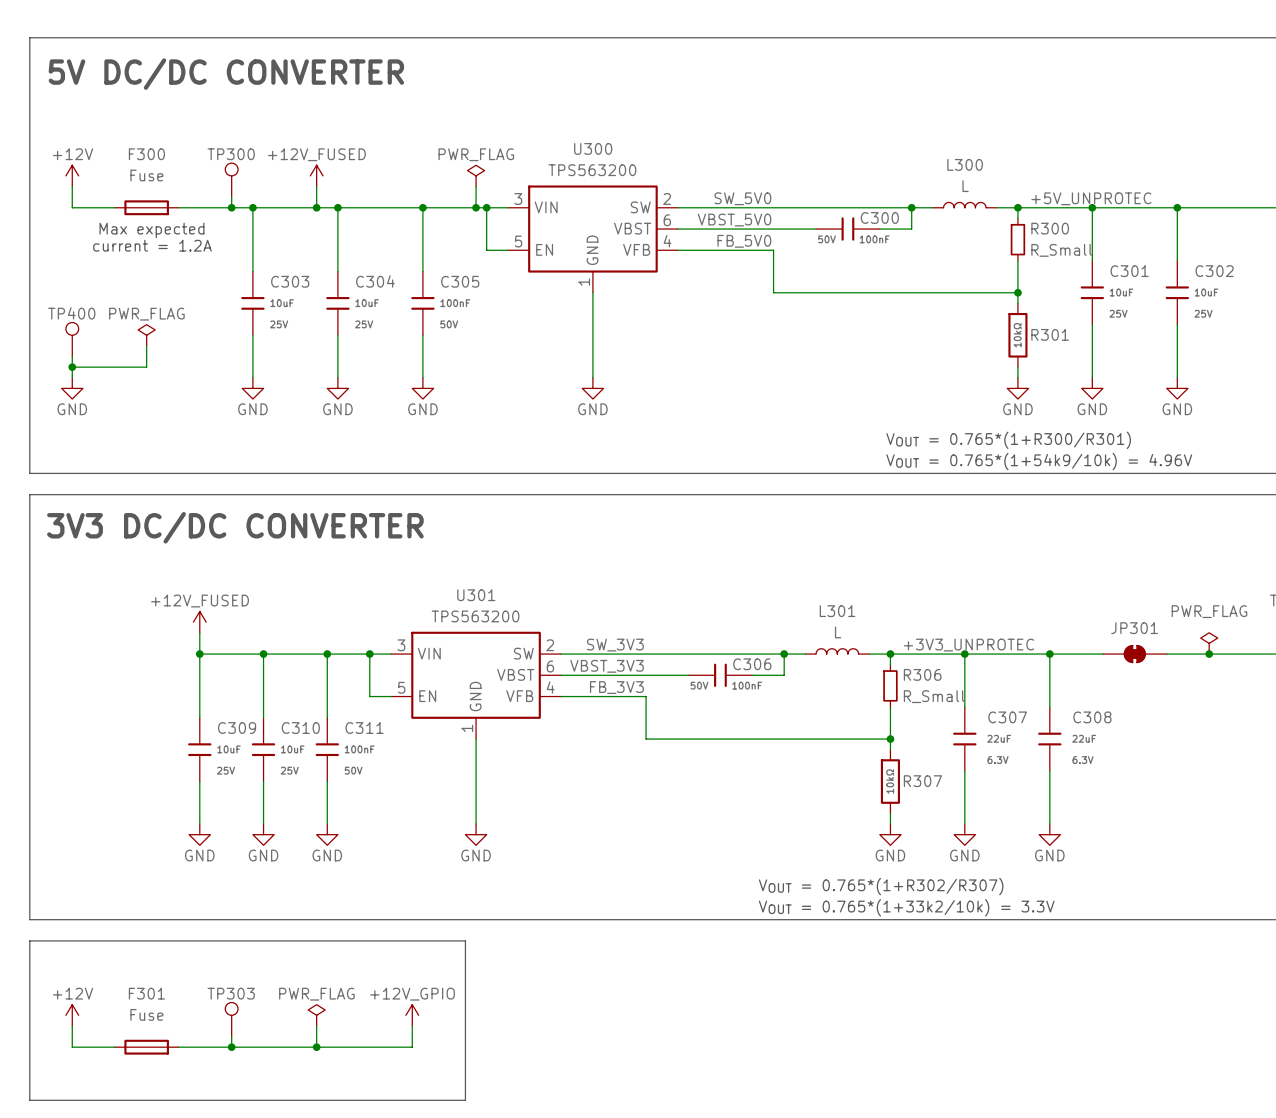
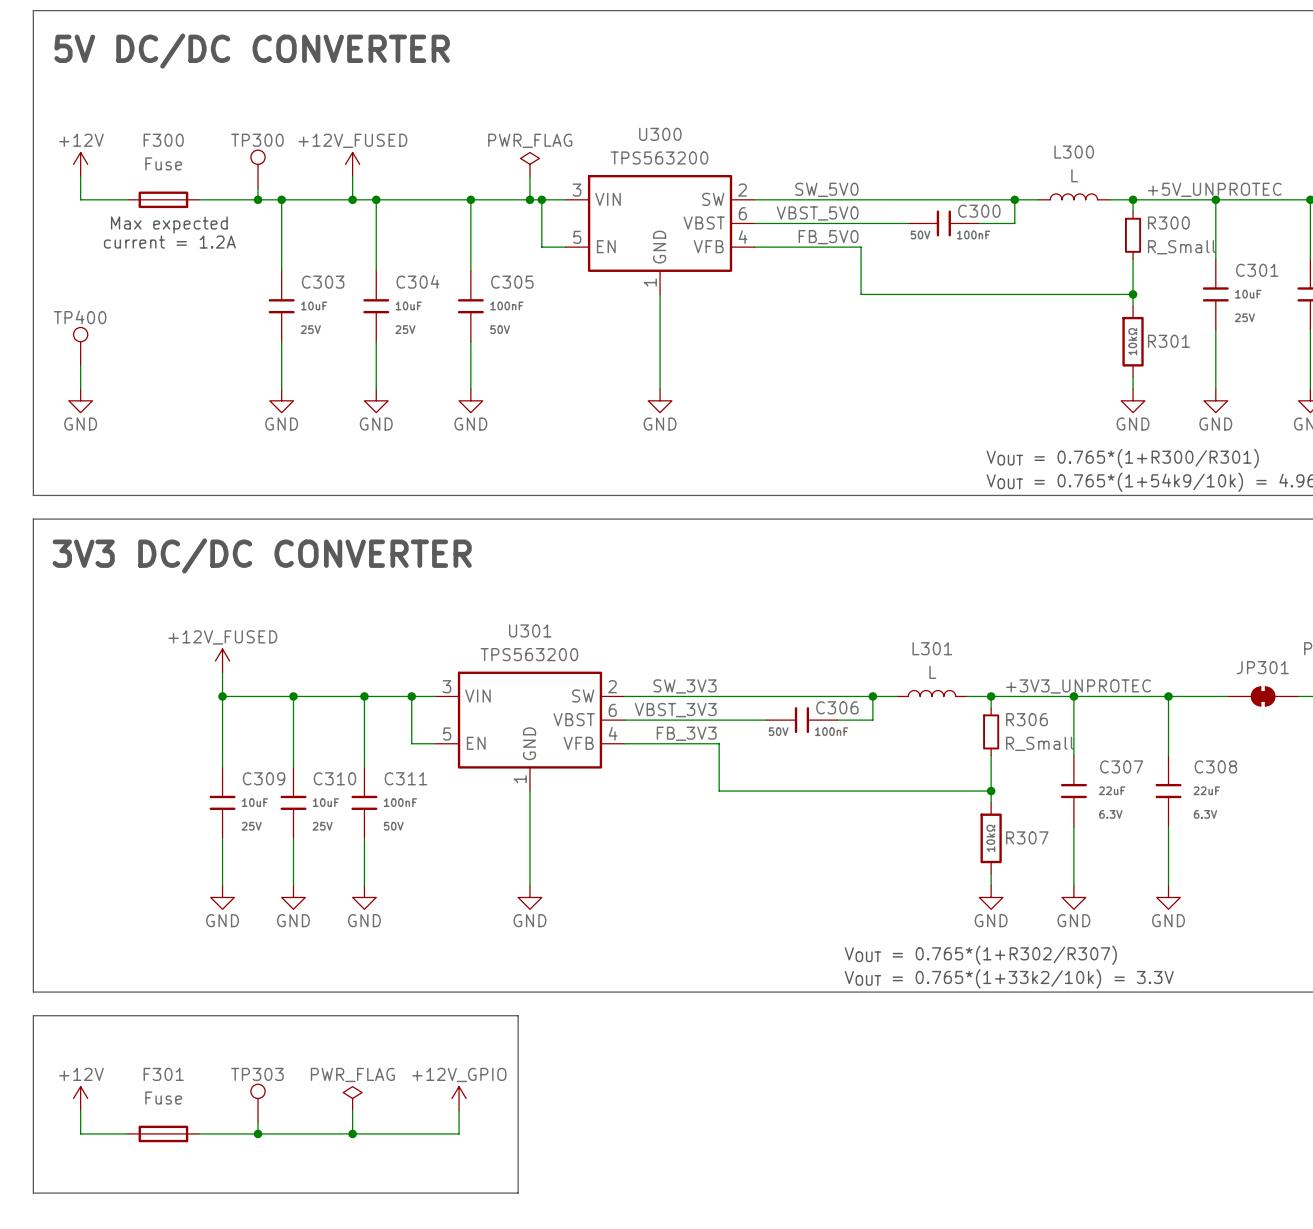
power symbol: PWR_FLAG (146, 335) -> none
wire: (146, 345) (146, 367) (72, 367) -> none
junction: (72, 367) -> none

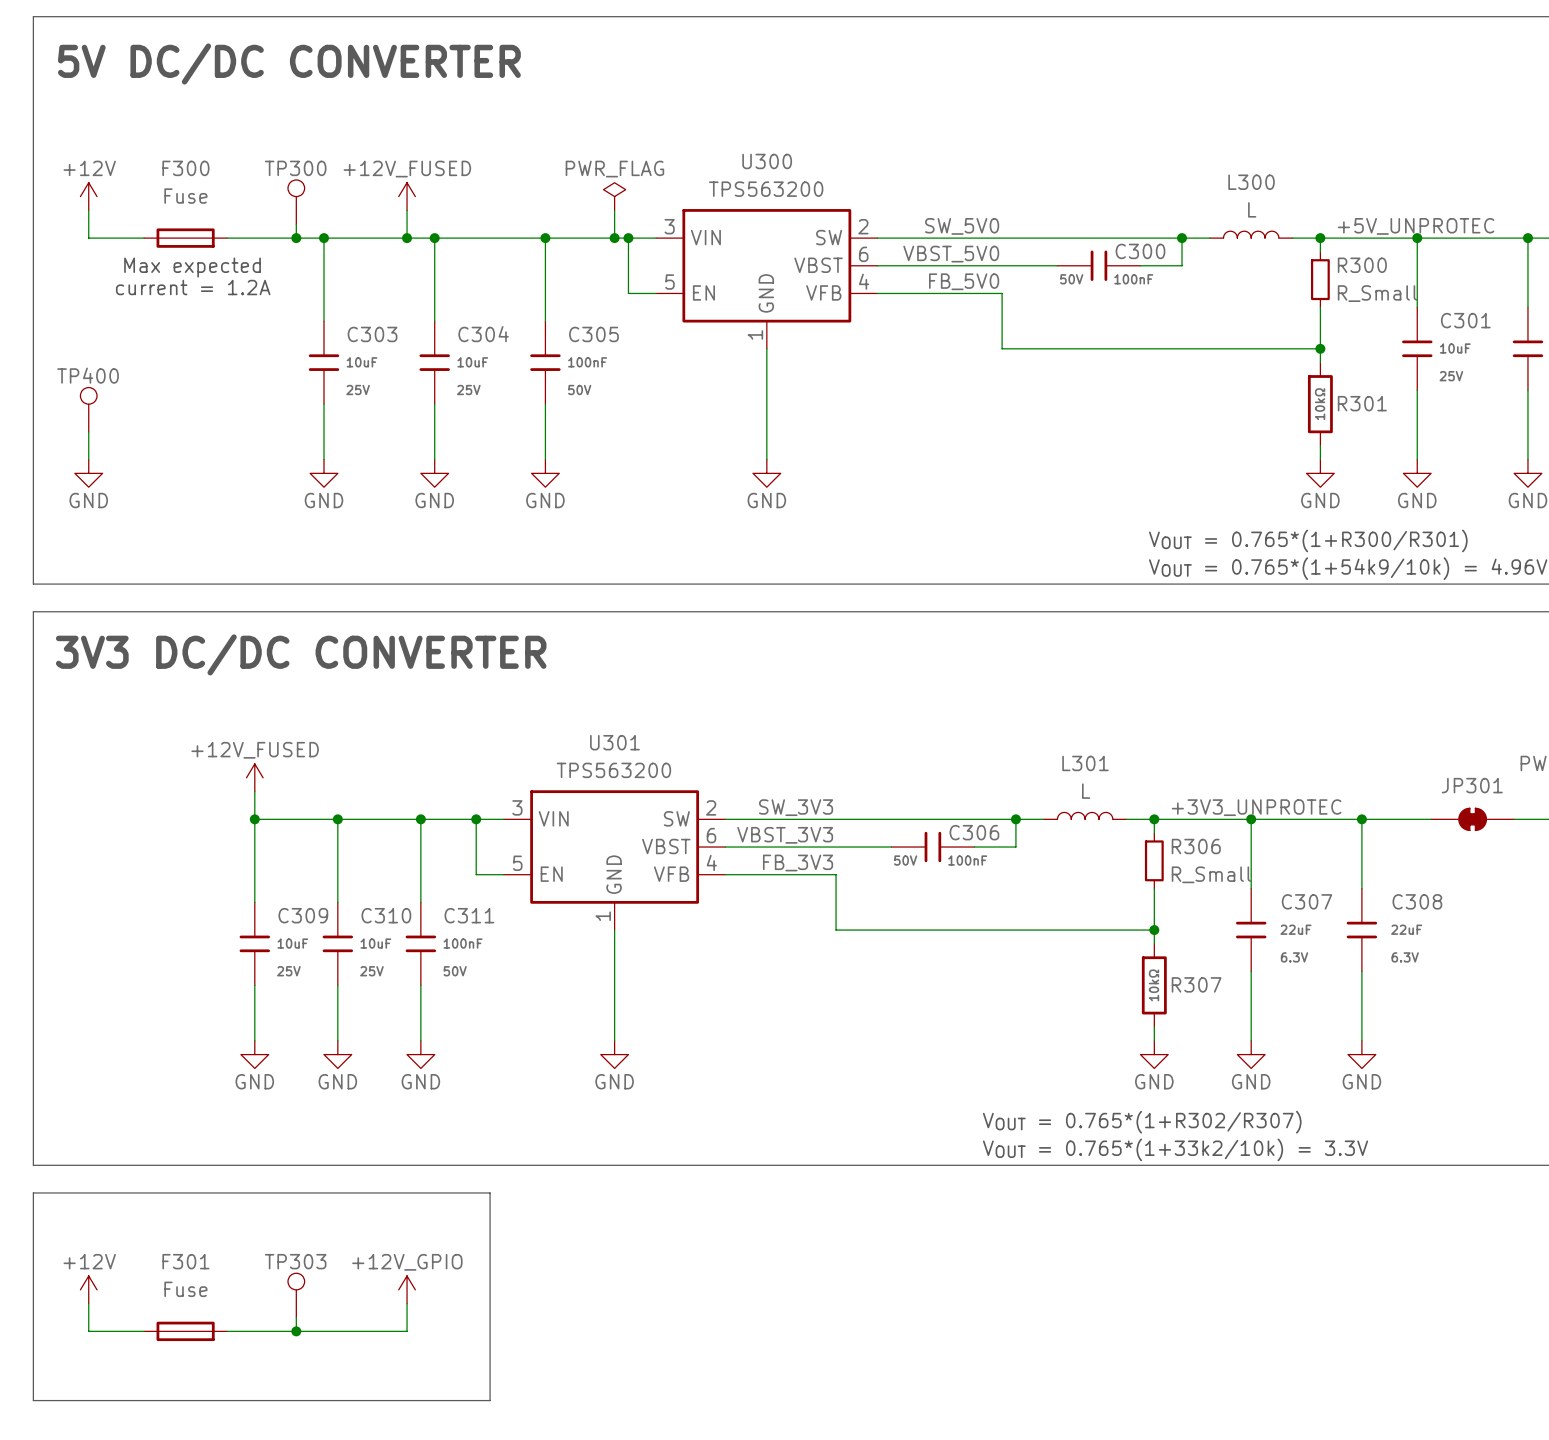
line: (423, 1015) (518, 1015) (518, 1193) (423, 1193) -> (490, 1192) (490, 1400)
power symbol: PWR_FLAG (352, 1098) -> +12V_GPIO (407, 1289)
power symbol: +12V_GPIO (459, 1098) -> none
wire: (459, 1110) (459, 1133) (352, 1133) -> none
junction: (352, 1133) -> none

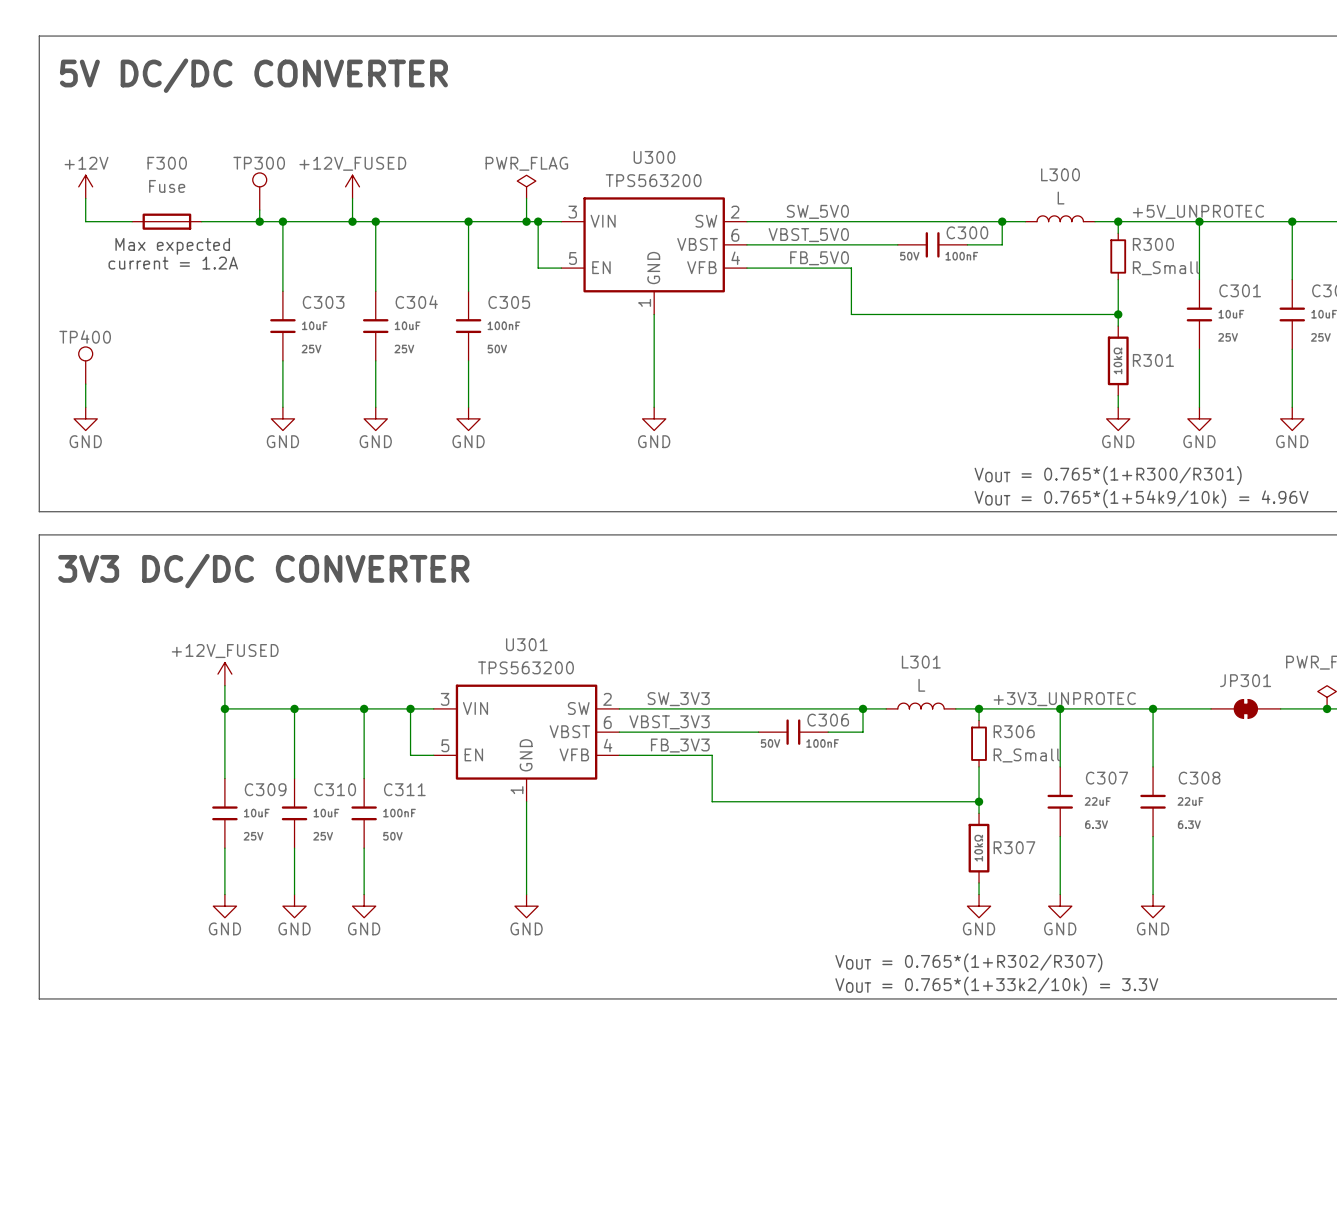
line: (33, 1192) (490, 1192) (490, 1400) (33, 1400) (33, 1192) -> none
power symbol: +12V (88, 1289) -> none
power symbol: +12V_GPIO (407, 1289) -> none
TP303: (296, 1295) -> none
wire: (88, 1303) (88, 1331) (144, 1331) -> none
wire: (407, 1303) (407, 1331) (227, 1331) -> none
wire: (296, 1317) (296, 1331) -> none
F301: Fuse (185, 1331) -> none
junction: (296, 1331) -> none

